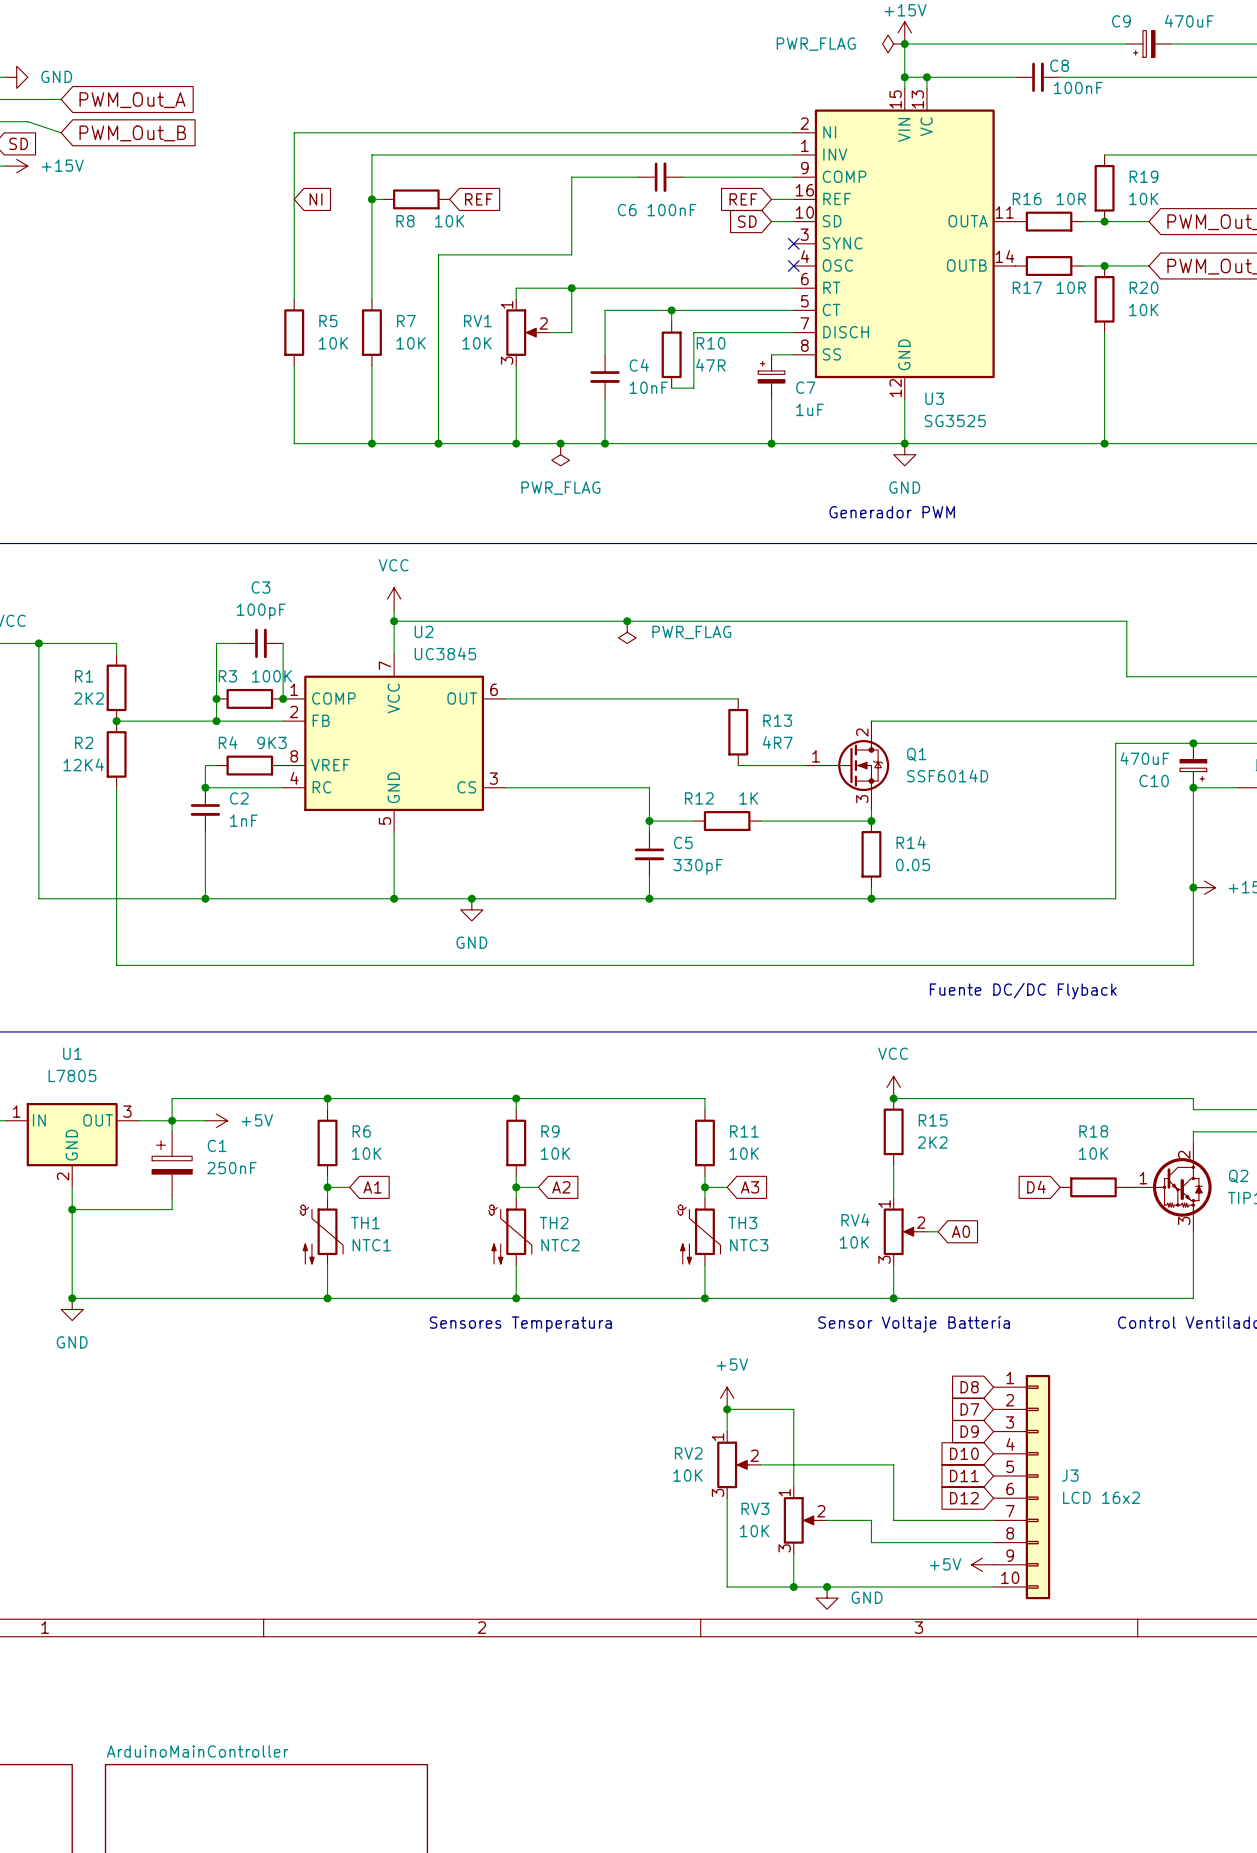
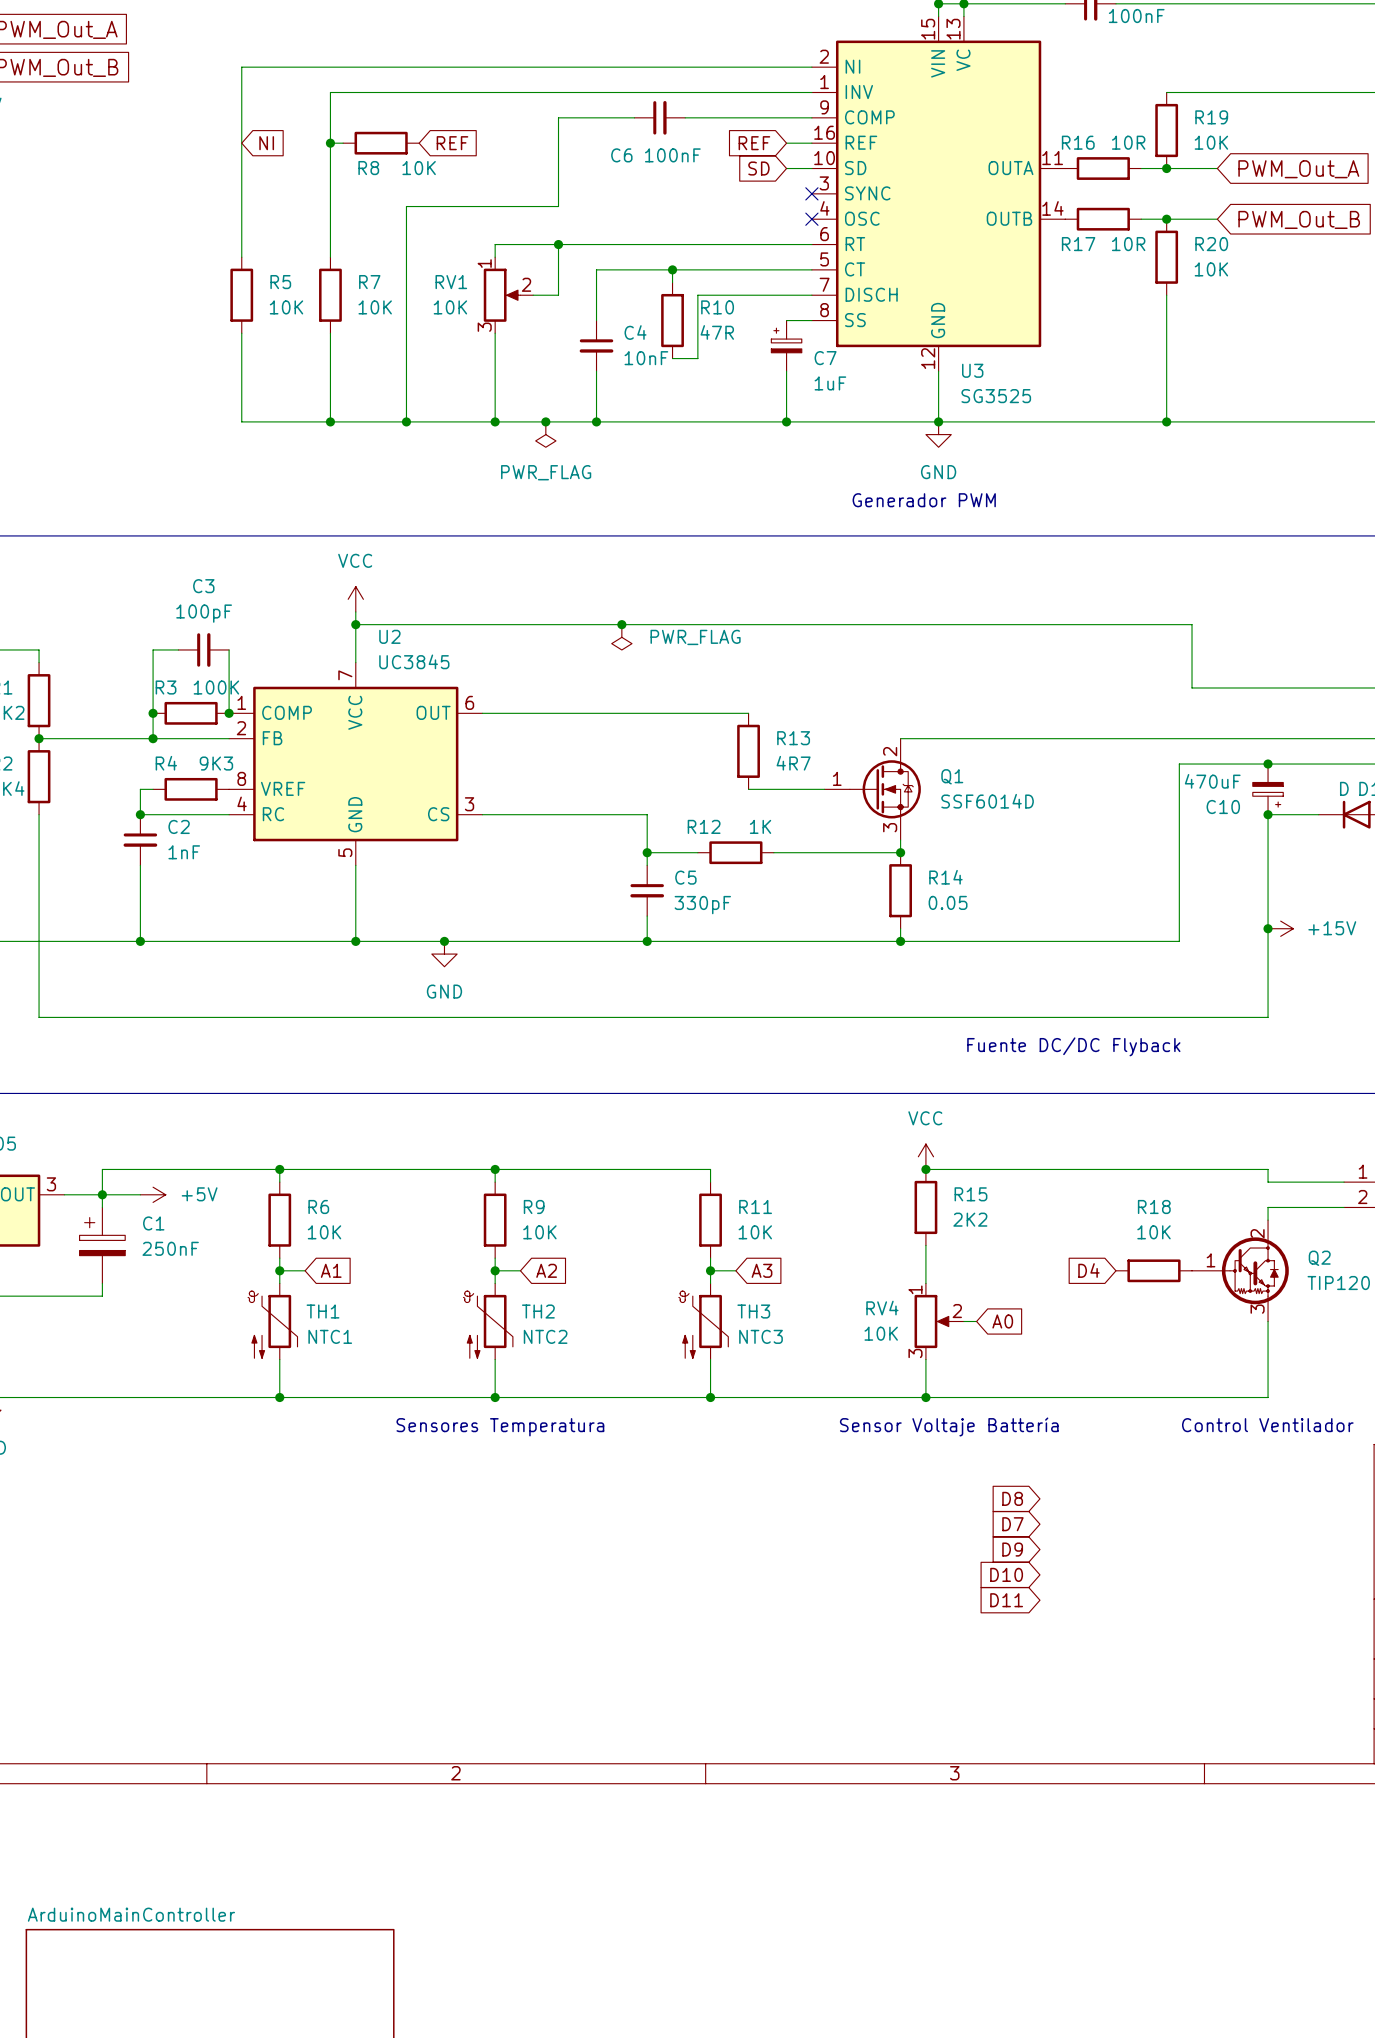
power symbol: +5V (727, 1398) -> none
junction: (727, 1409) -> none
wire: (727, 1431) (727, 1409) (793, 1409) (793, 1487) -> none
RV2: 10K (738, 1464) -> none
wire: (760, 1464) (893, 1464) (893, 1520) (993, 1520) -> none
J3: LCD 16x2 (1021, 1487) -> none
wire: (727, 1498) (727, 1587) (993, 1587) -> none
global label: D12 (964, 1498) -> none
RV3: 10K (805, 1520) -> none
wire: (827, 1520) (871, 1520) (871, 1542) (993, 1542) -> none
wire: (793, 1553) (793, 1587) -> none
power symbol: +5V (982, 1564) -> none
junction: (793, 1587) -> none
junction: (827, 1587) -> none
power symbol: GND (827, 1598) -> none

